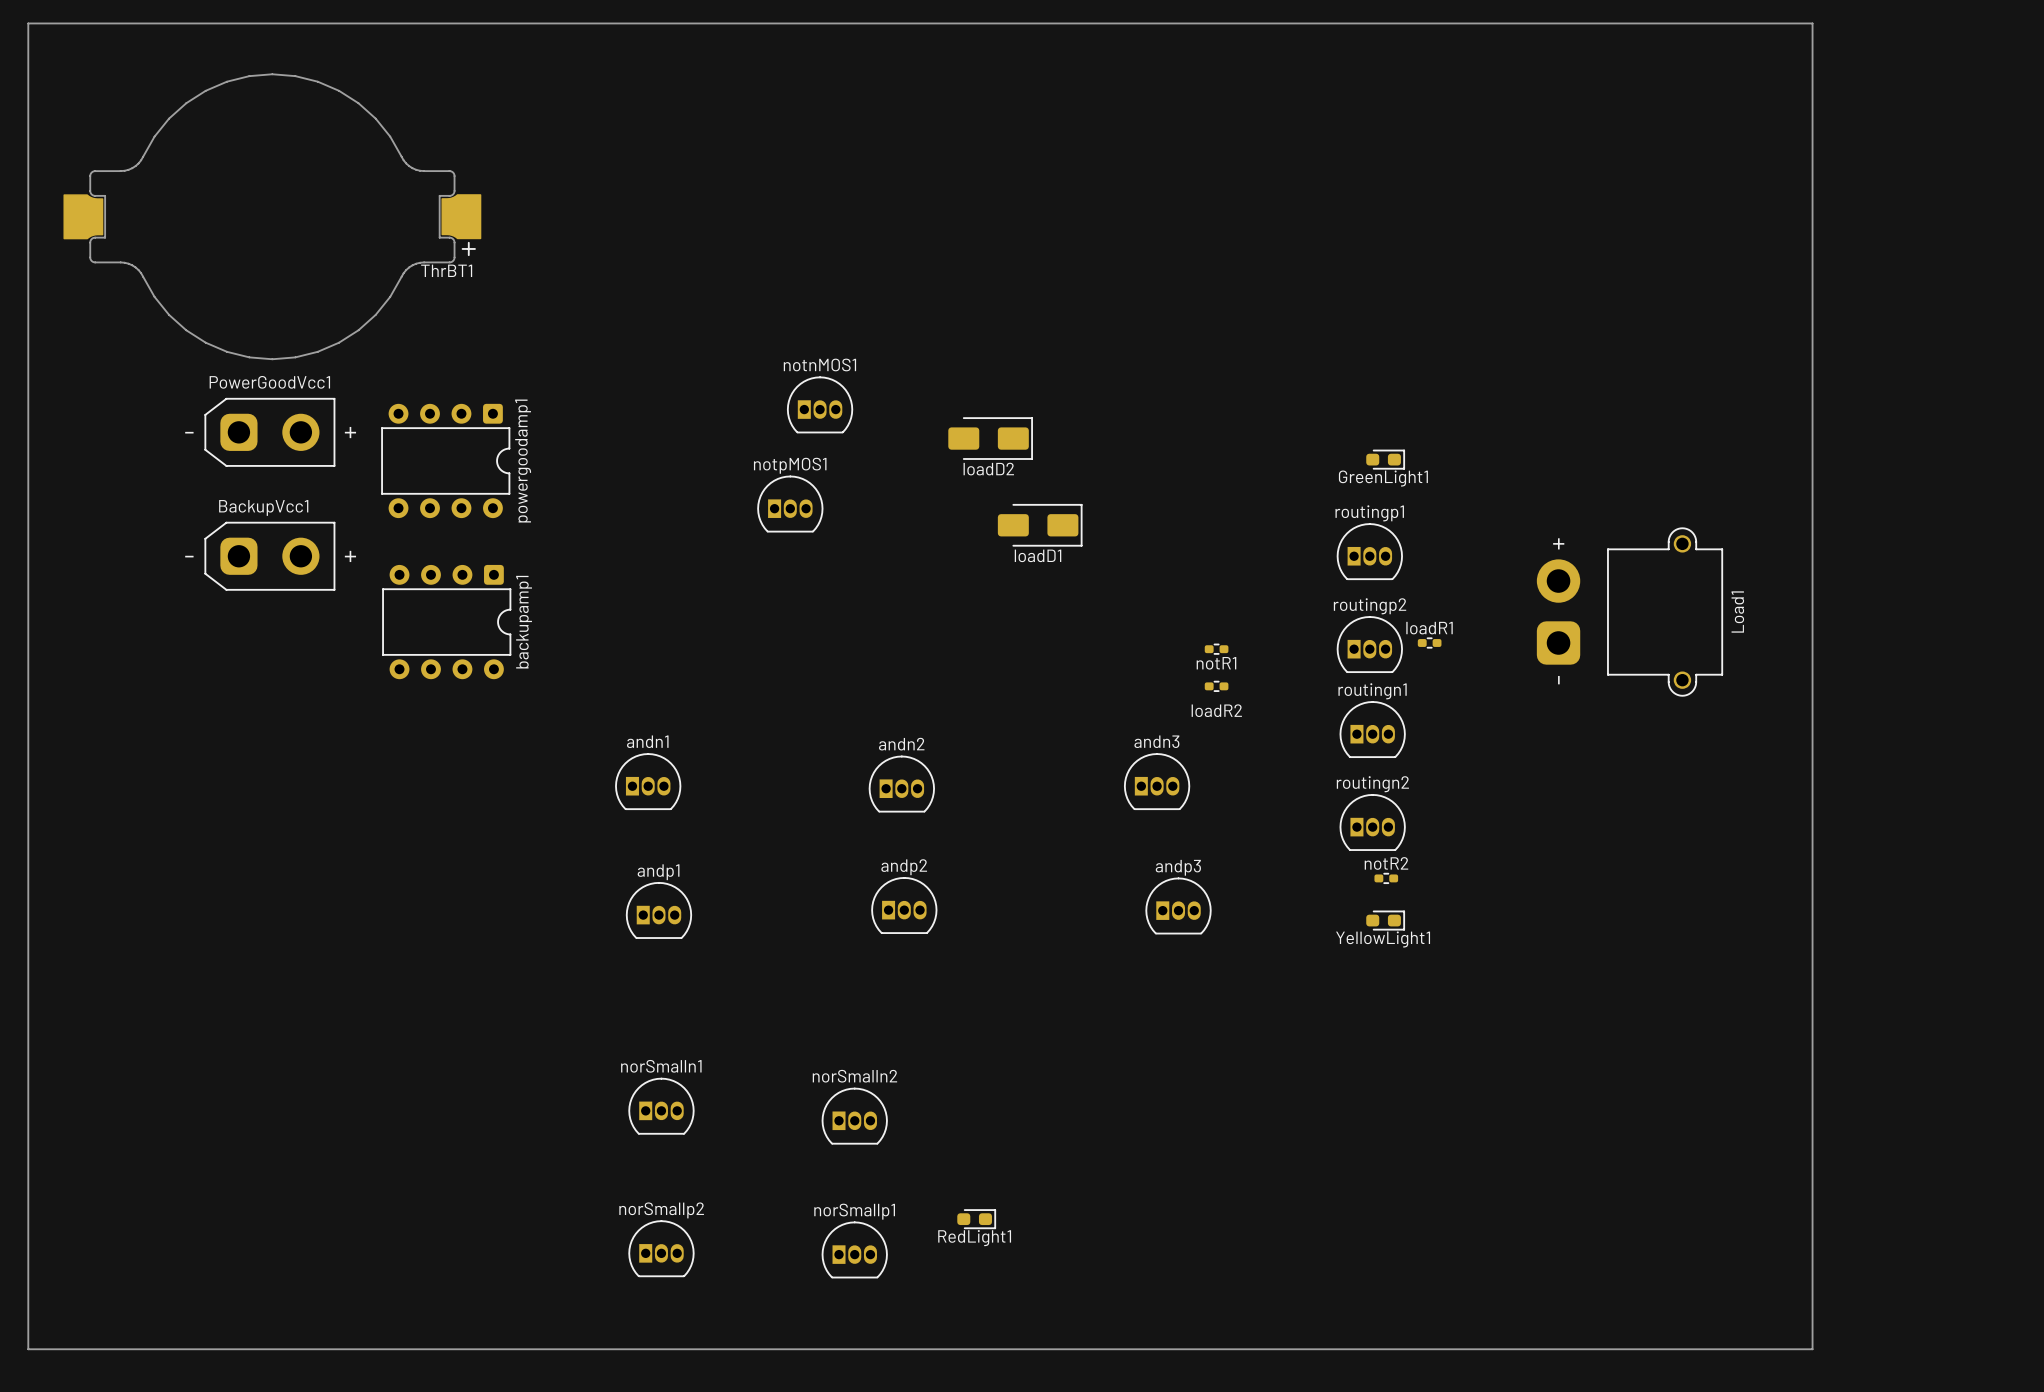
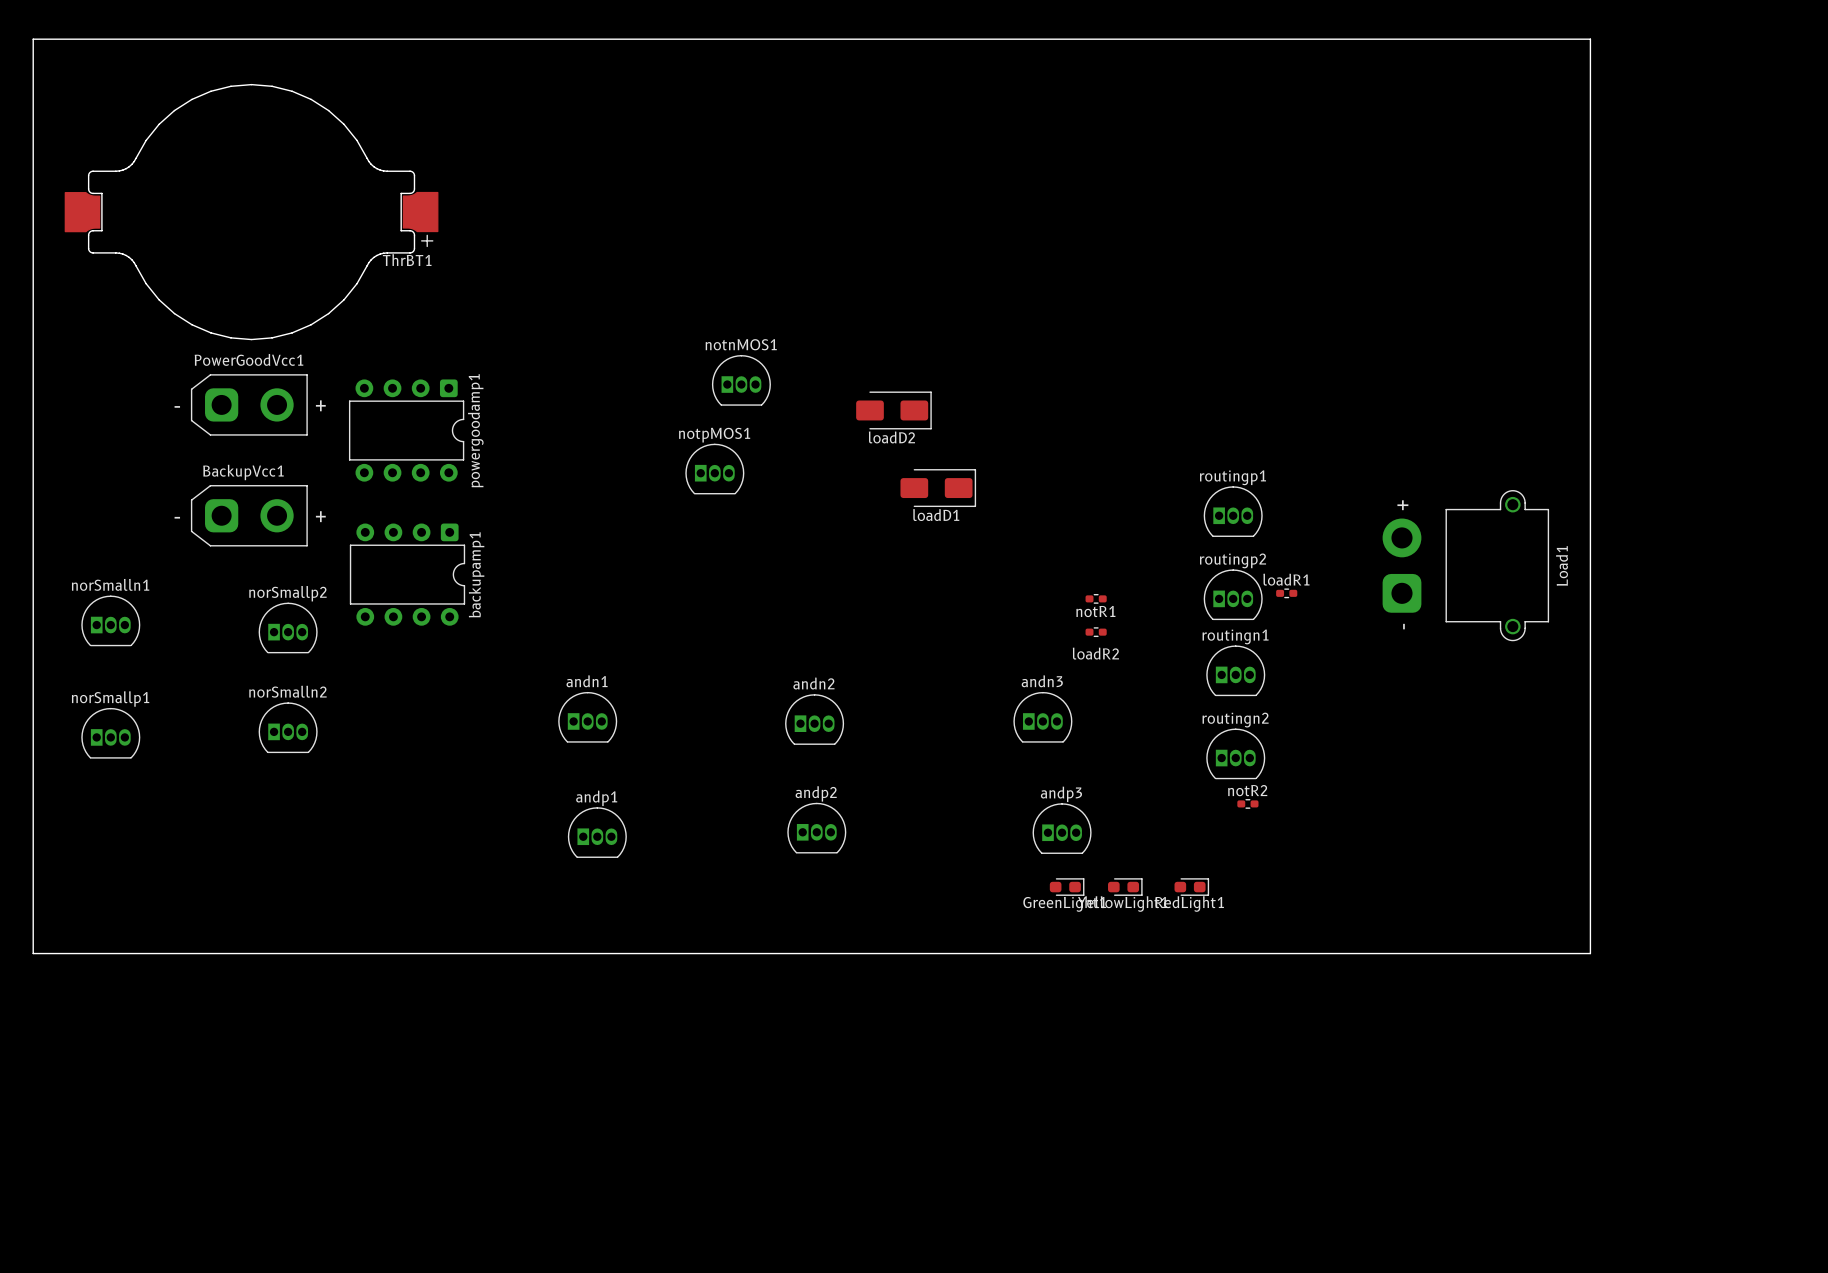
board edge: (1769, 23) (1812, 23) (1812, 1349) (28, 1349) (28, 1045) -> (1590, 39) (1590, 953) (33, 953)
GreenLight1 position: (1385, 459) -> (1067, 887)
YellowLight1 position: (1385, 920) -> (1125, 887)
norSmalln1 position: (661, 1106) -> (110, 620)
norSmalln2 position: (854, 1116) -> (288, 727)
RedLight1 position: (976, 1219) -> (1191, 887)
norSmallp2 position: (661, 1248) -> (288, 627)
norSmallp1 position: (854, 1249) -> (110, 733)

